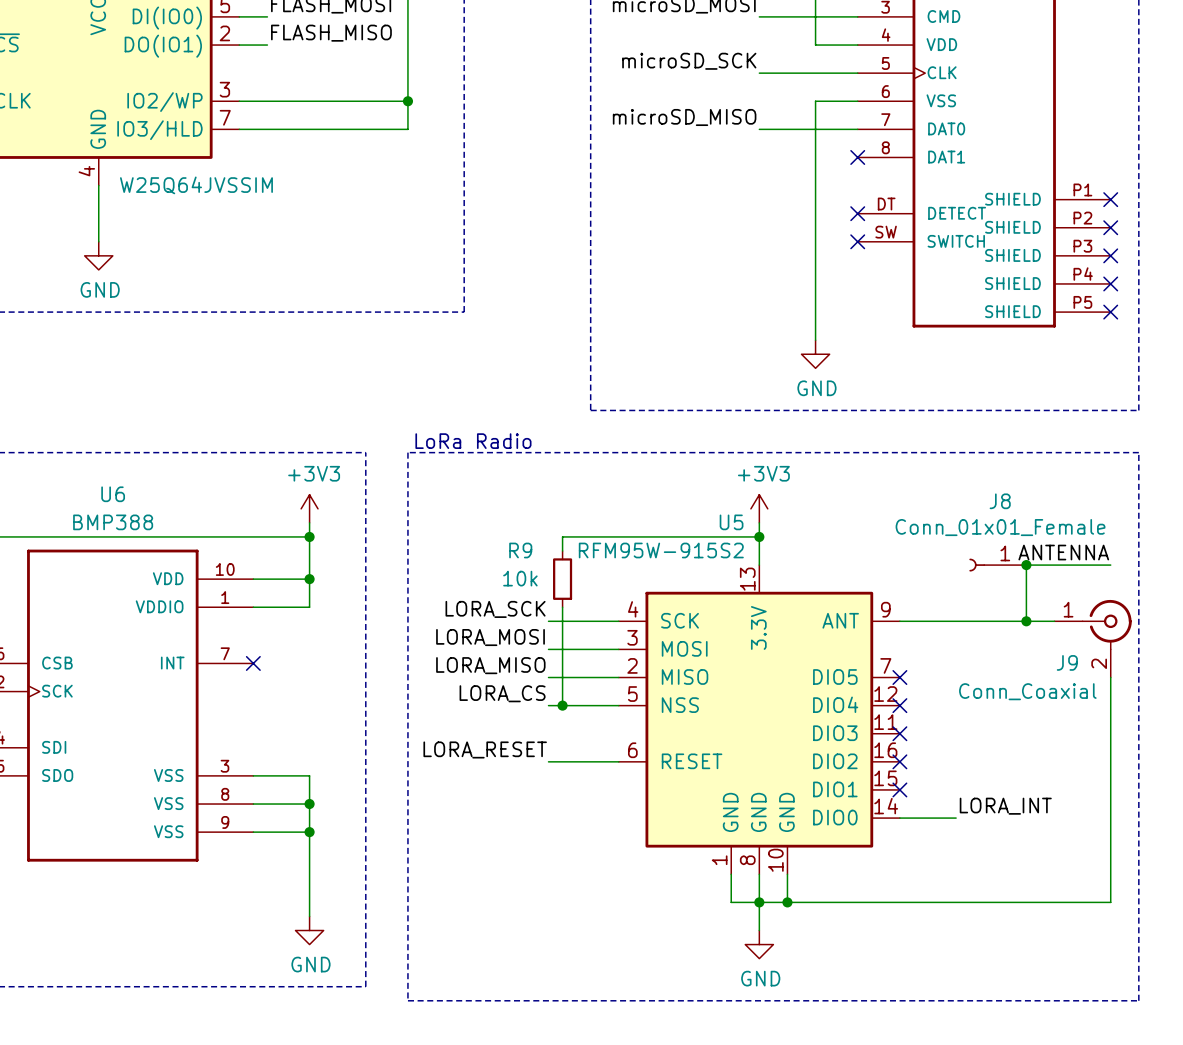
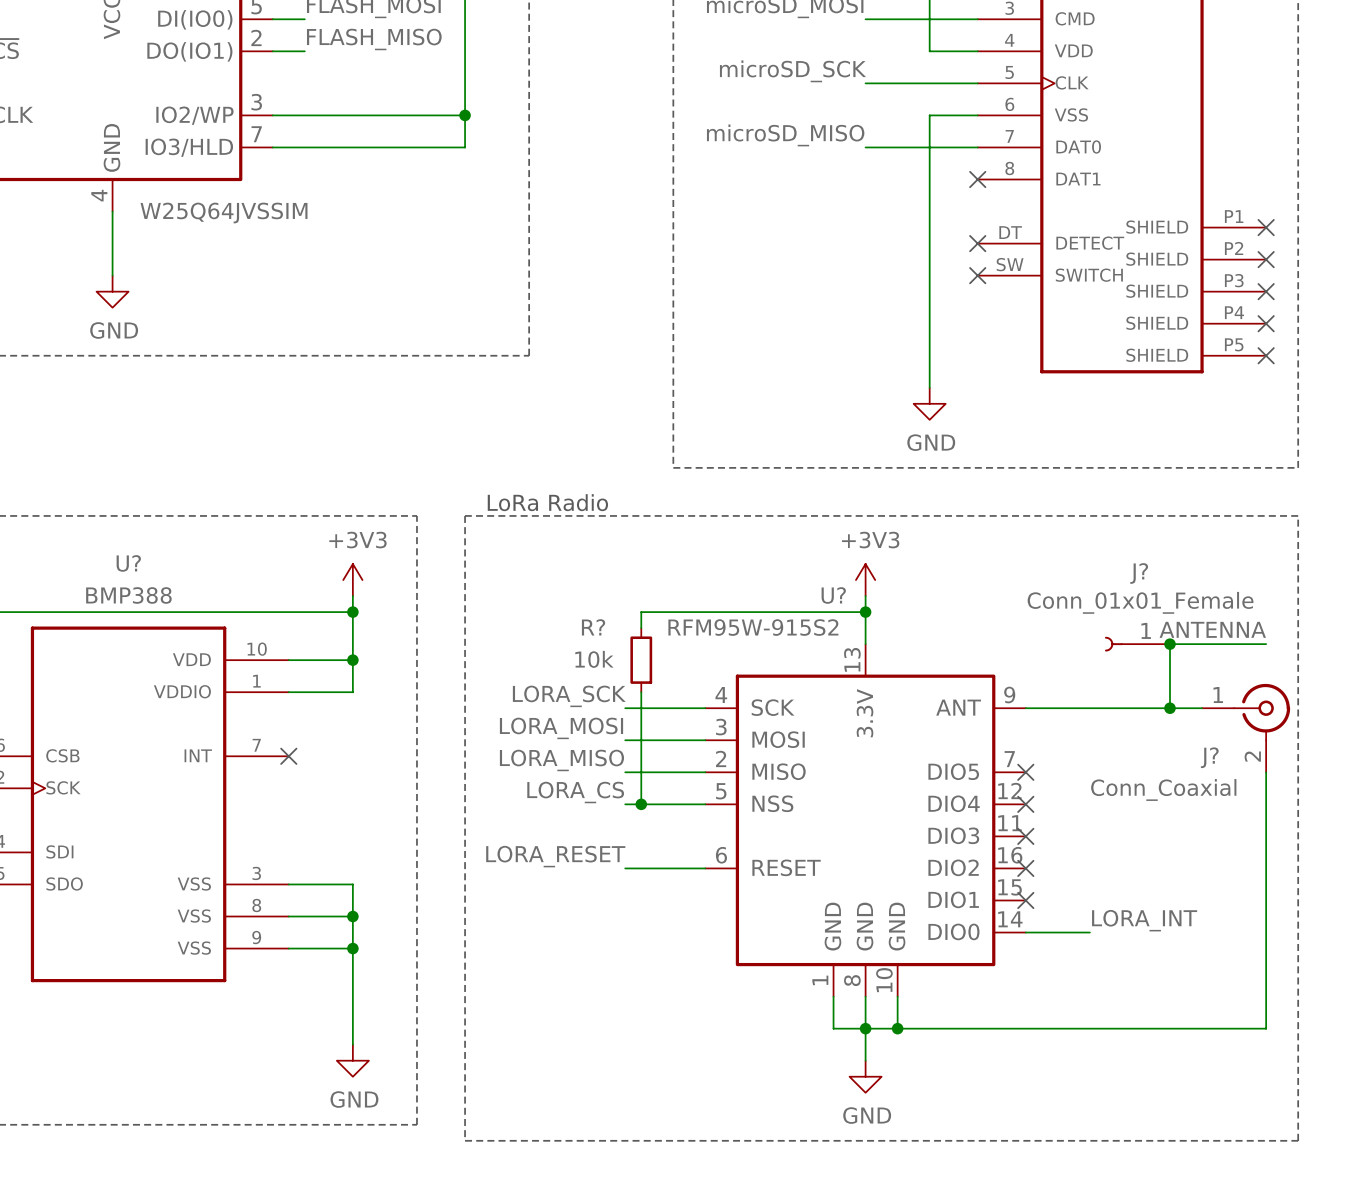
U6 name: U6 (113, 494) -> U? (128, 563)
J8 name: J8 (1000, 501) -> J? (1139, 573)
U5 name: U5 (731, 522) -> U? (833, 595)
R9 name: R9 (520, 550) -> R? (593, 627)
J9 name: J9 (1067, 662) -> J? (1209, 757)

